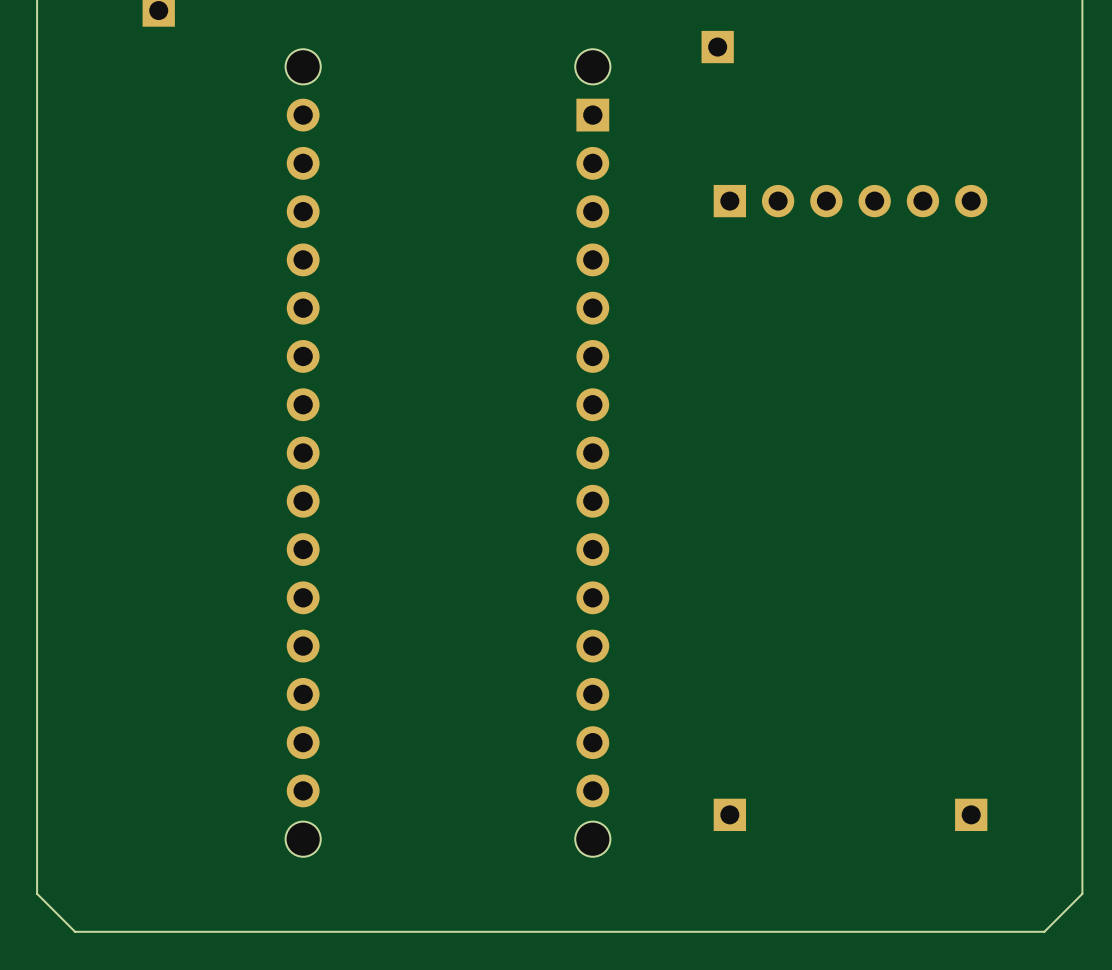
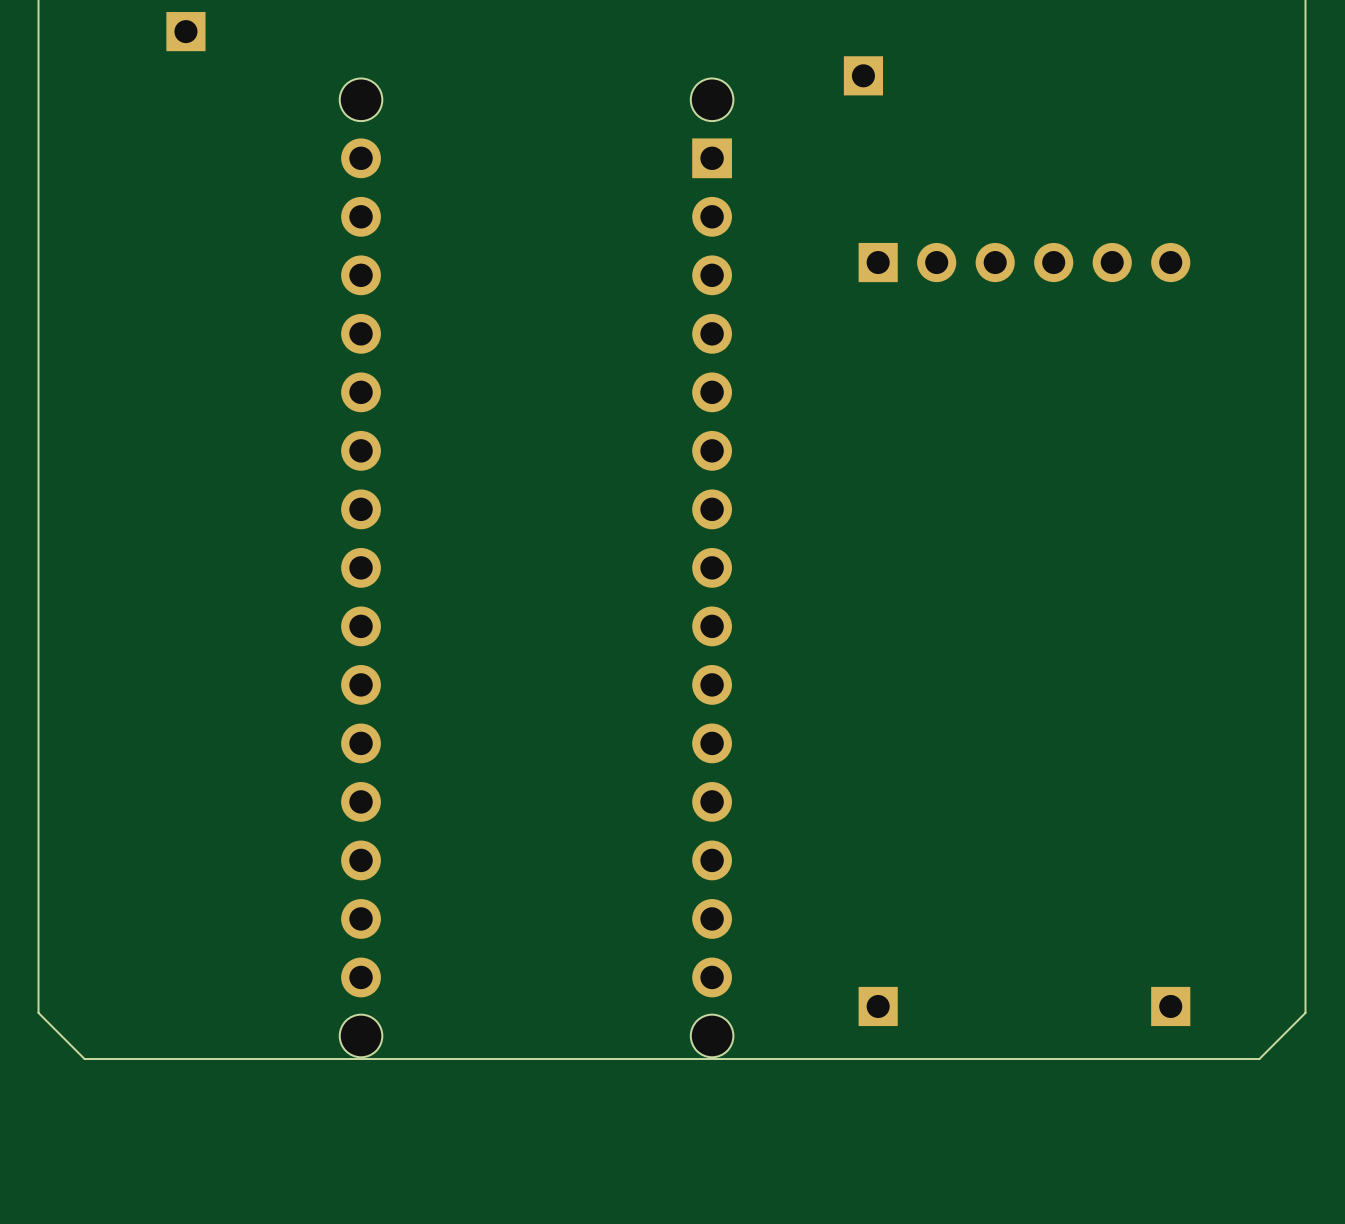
board edge: (1082, 820) (1082, 893) (1044, 931) (75, 931) (37, 893) (37, 820) -> (1305, 1012) (1259, 1059) (84, 1059) (38, 1012)

